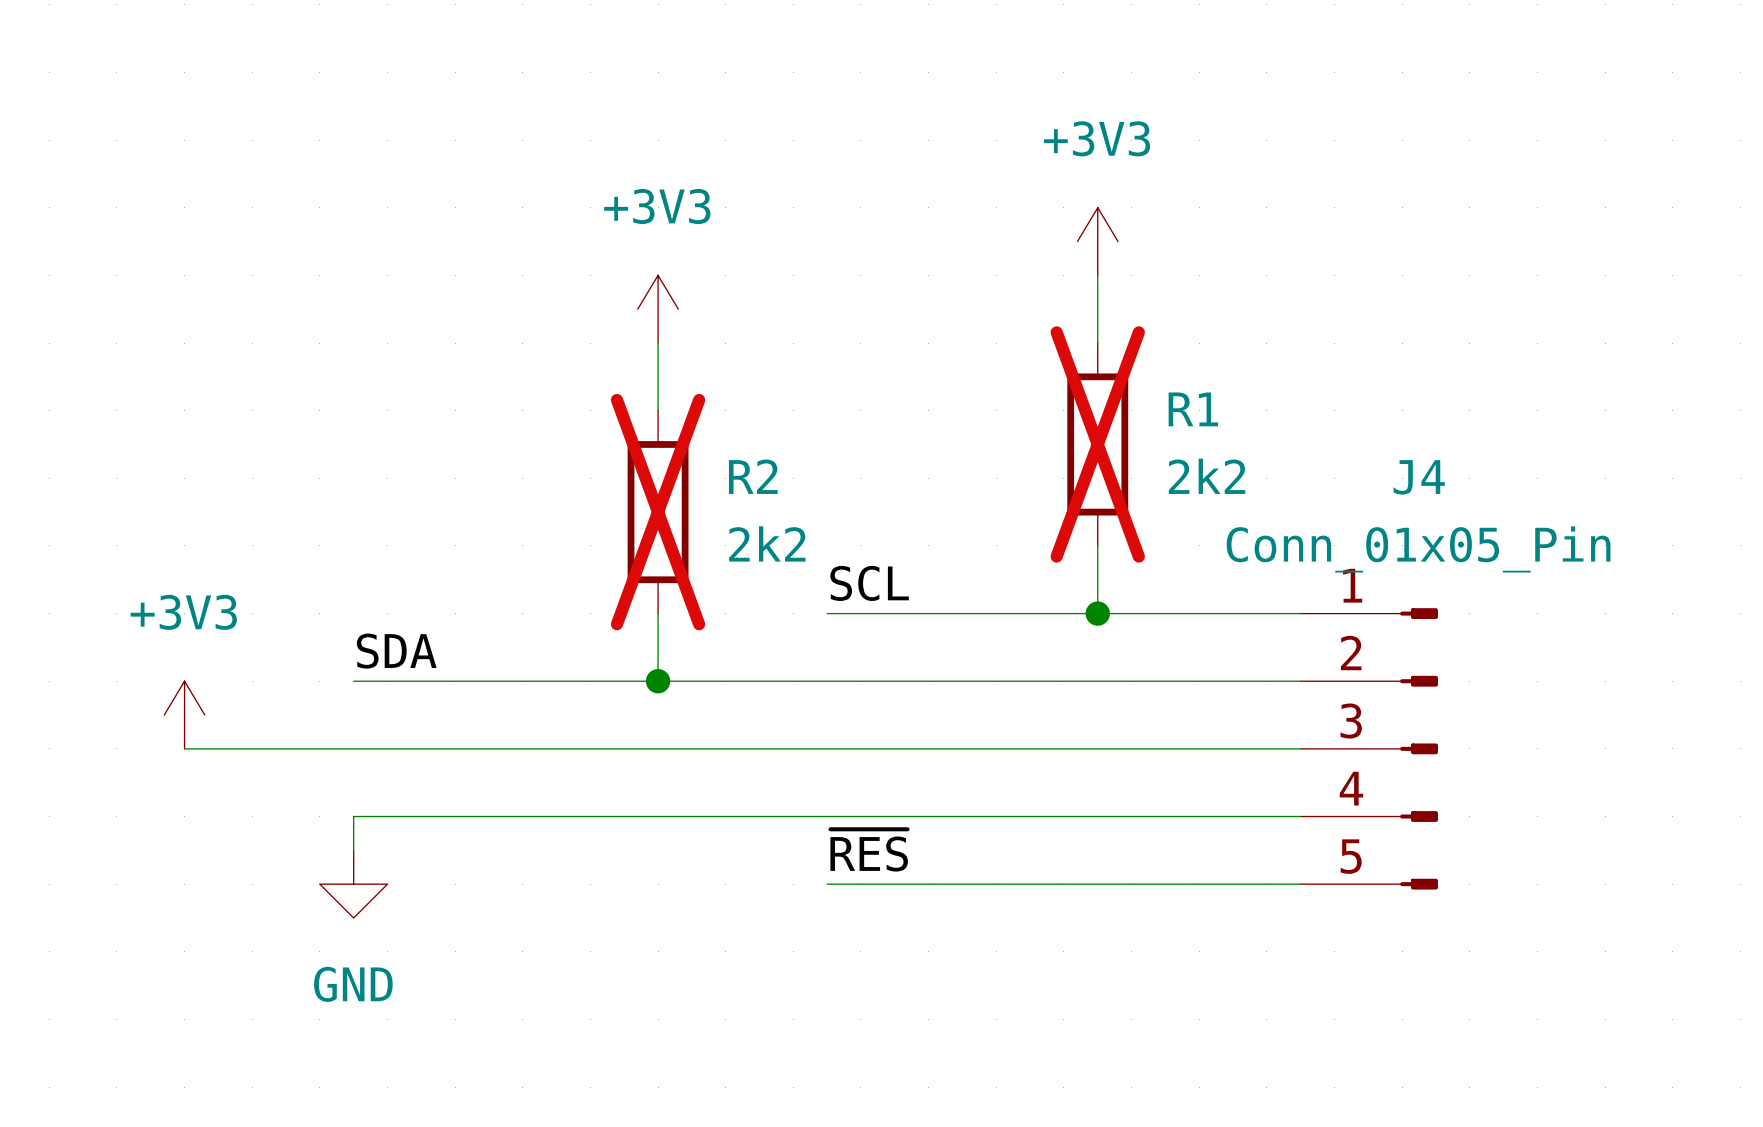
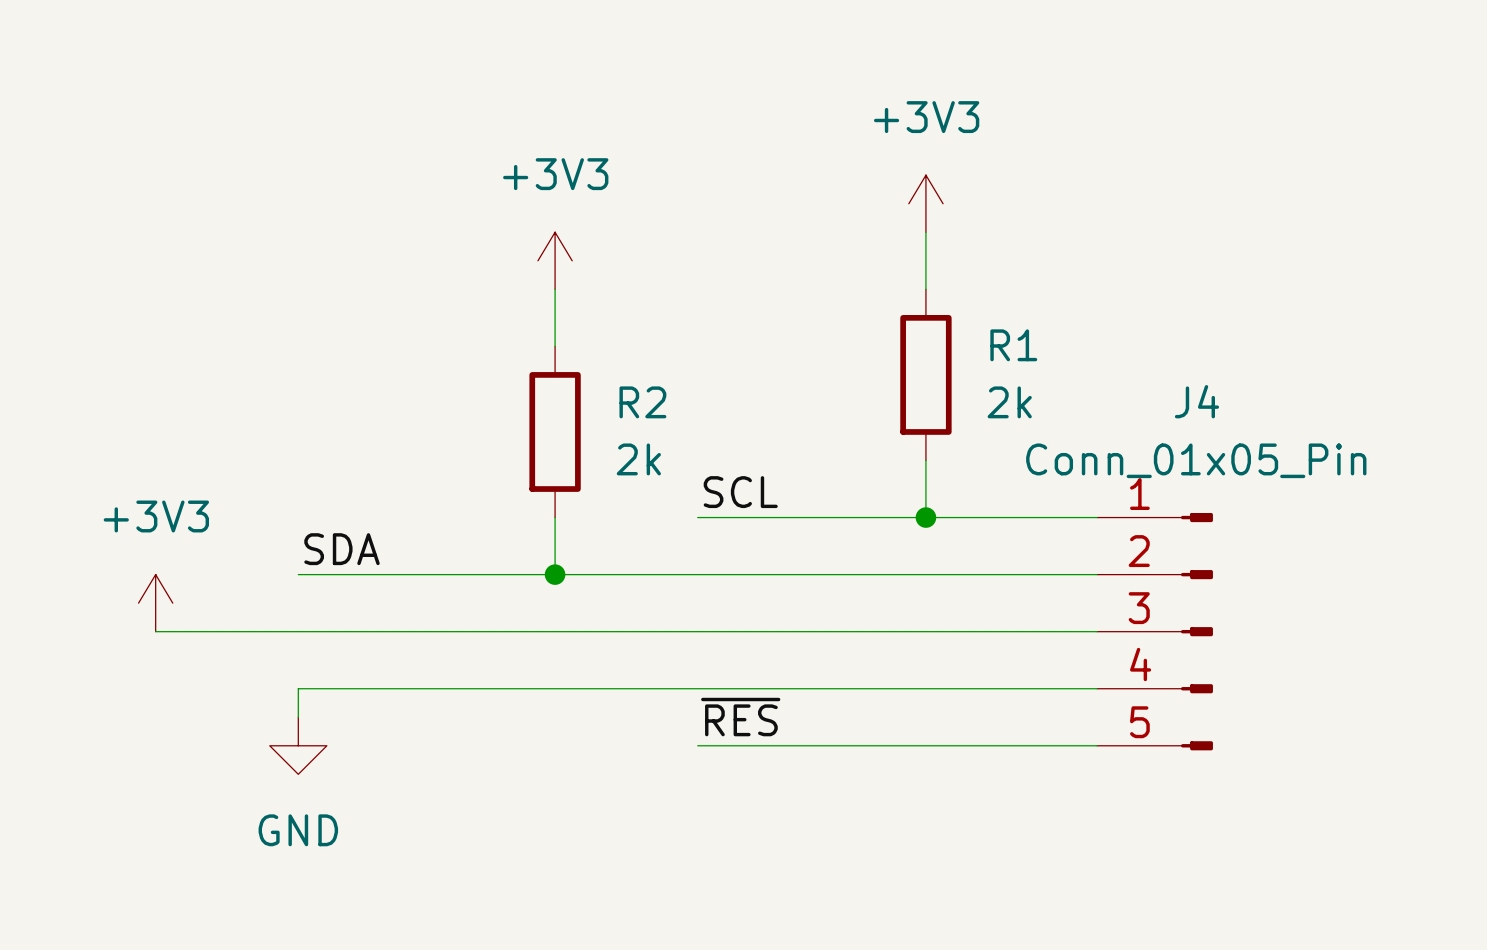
R1 do-not-place cross: (1097, 444) -> none
R1 value: 2k2 (1207, 476) -> 2k (1009, 402)
R2 do-not-place cross: (658, 512) -> none
R2 value: 2k2 (767, 543) -> 2k (638, 459)

